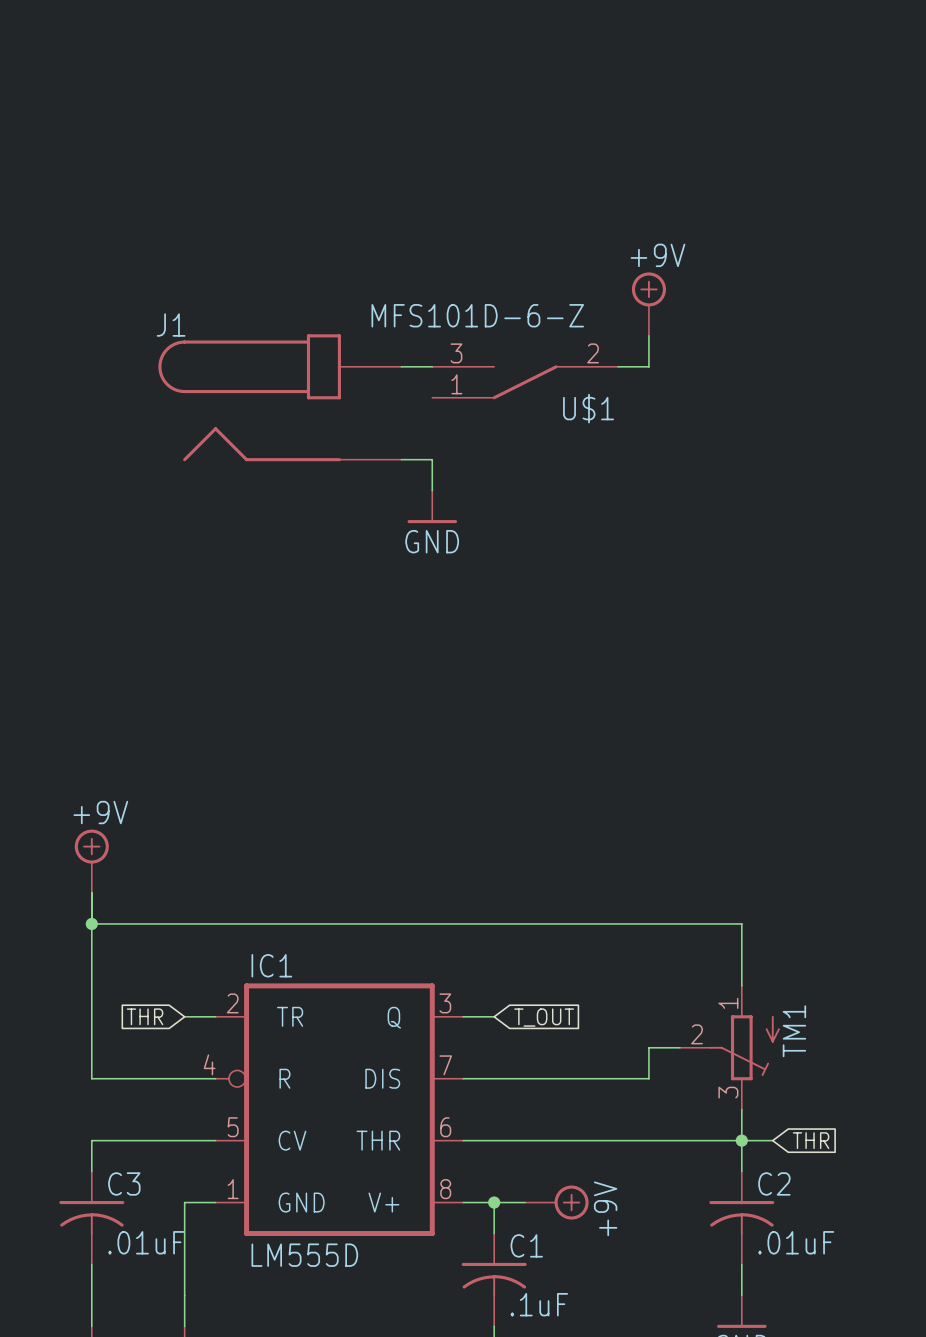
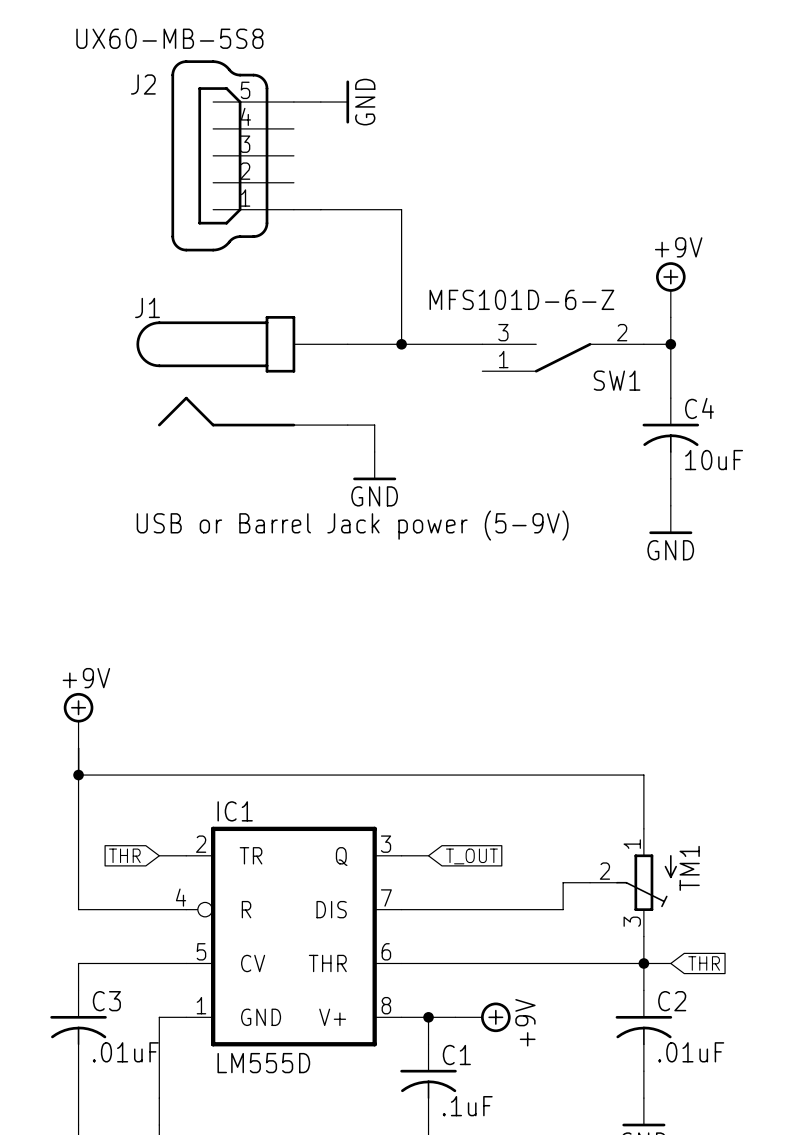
power symbol: none -> GND (334, 102)
J2: none -> UX60-MB-5S8 (232, 155)
wire: none -> (293, 209) (401, 209) (401, 344)
power symbol position: +9V (648, 304) -> +9V (670, 289)
wire: (648, 335) (648, 366) (618, 366) -> none
wire: (401, 366) (432, 366) -> (293, 102) (320, 102)
U$1: MFS101D-6-Z (525, 382) -> none
J1 position: (279, 397) -> (242, 371)
wire: none -> (670, 317) (670, 398)
wire: none -> (347, 344) (482, 344)
junction: none -> (401, 344)
wire: none -> (643, 344) (670, 344)
junction: none -> (670, 344)
SW1: none -> MFS101D-6-Z (563, 357)
wire: (401, 459) (432, 459) (432, 490) -> (347, 425) (374, 425) (374, 451)
power symbol position: GND (432, 506) -> GND (374, 466)
C4: none -> 10uF (670, 438)
wire: none -> (670, 478) (670, 505)
power symbol: none -> GND (670, 519)
text: none -> USB or Barrel Jack power (5-9V) (352, 525)

